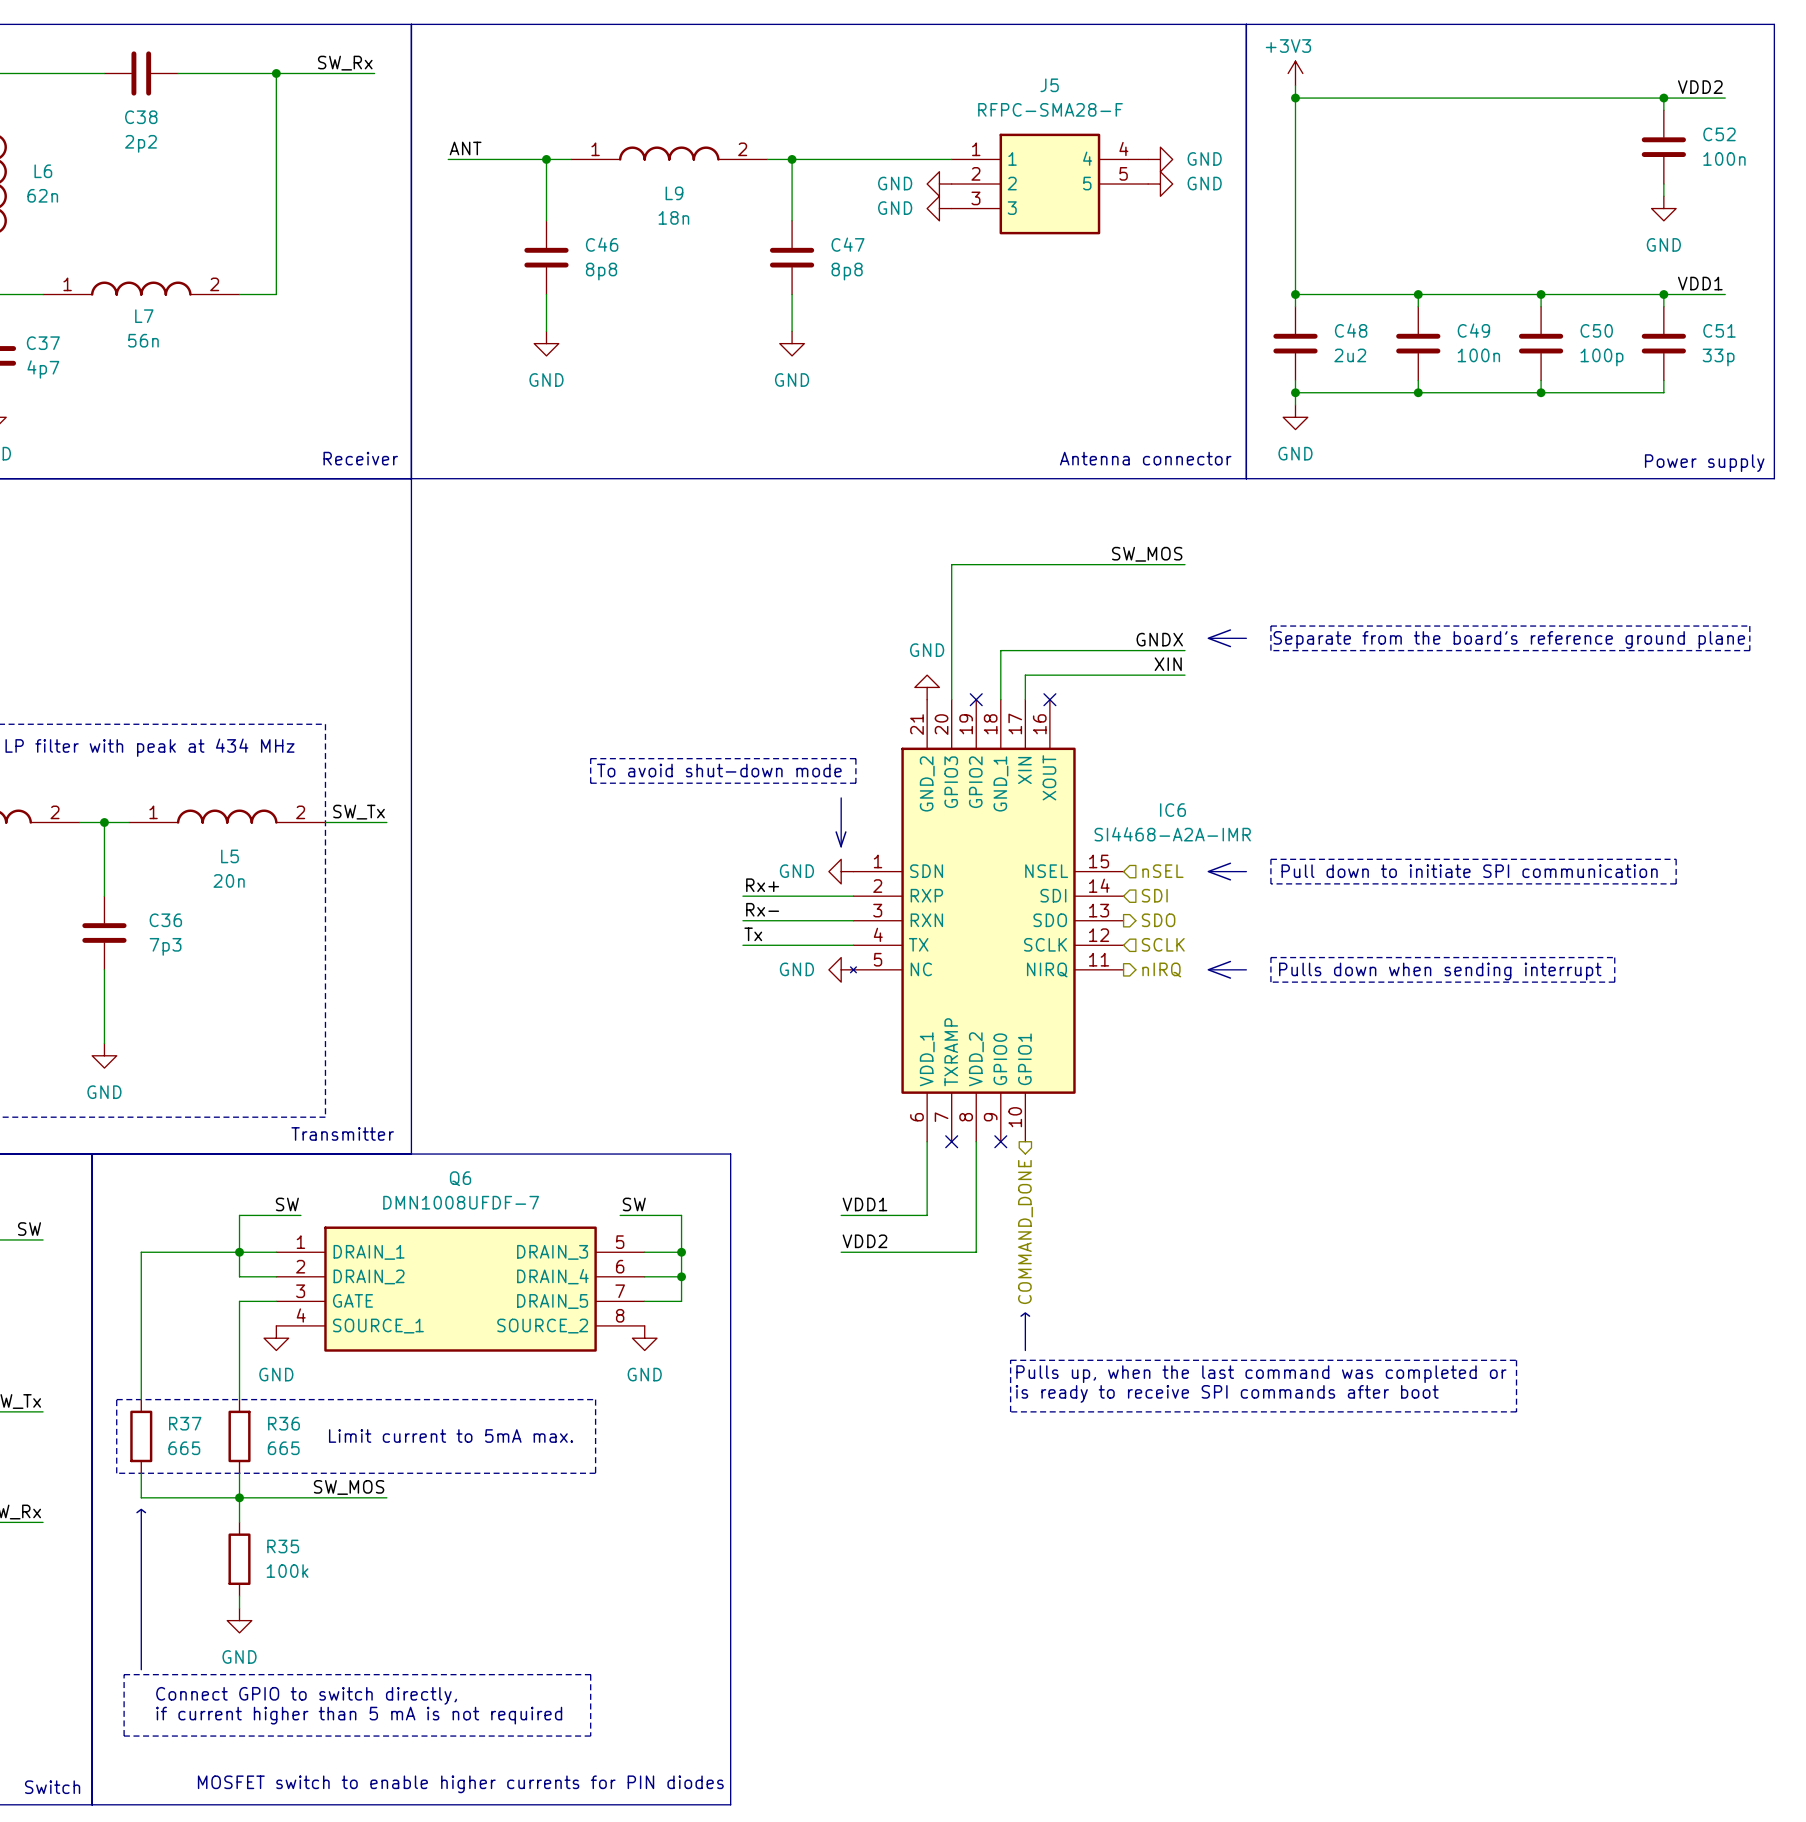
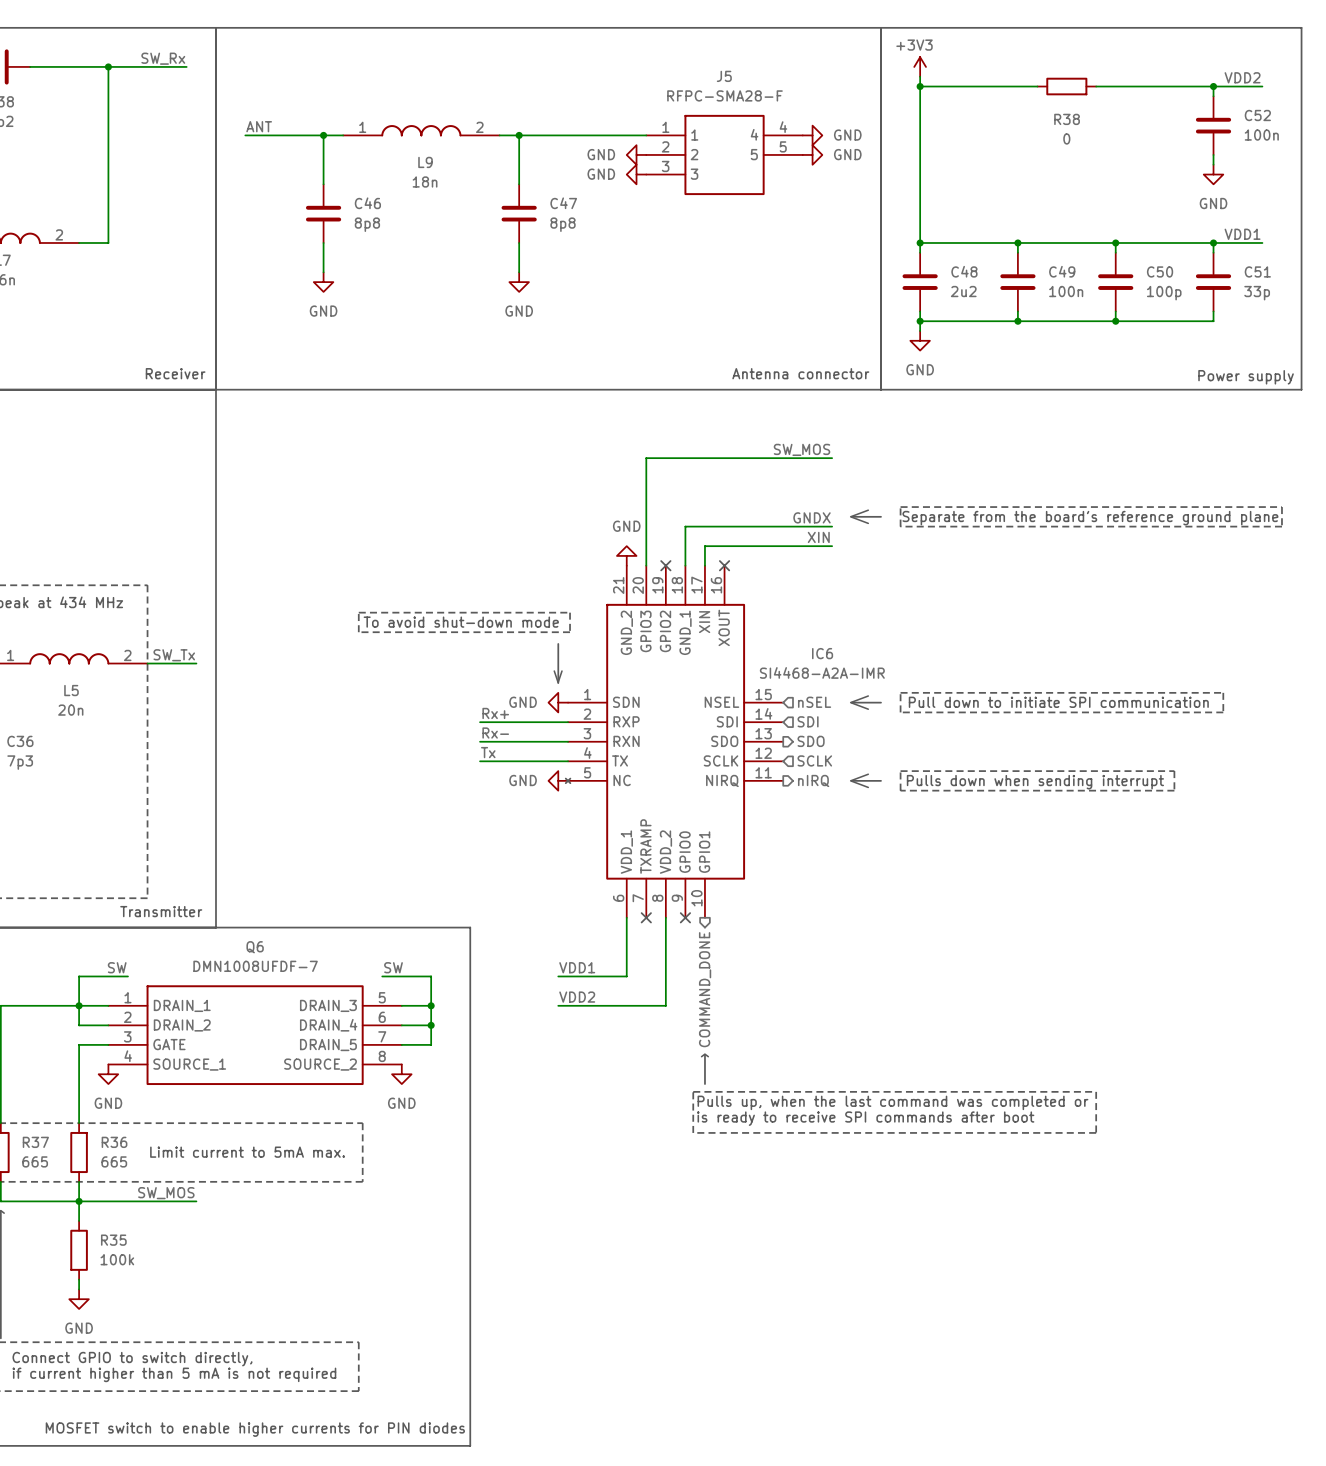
wire: (1442, 98) (1516, 98) -> none
R38: none -> 0 (1066, 86)

